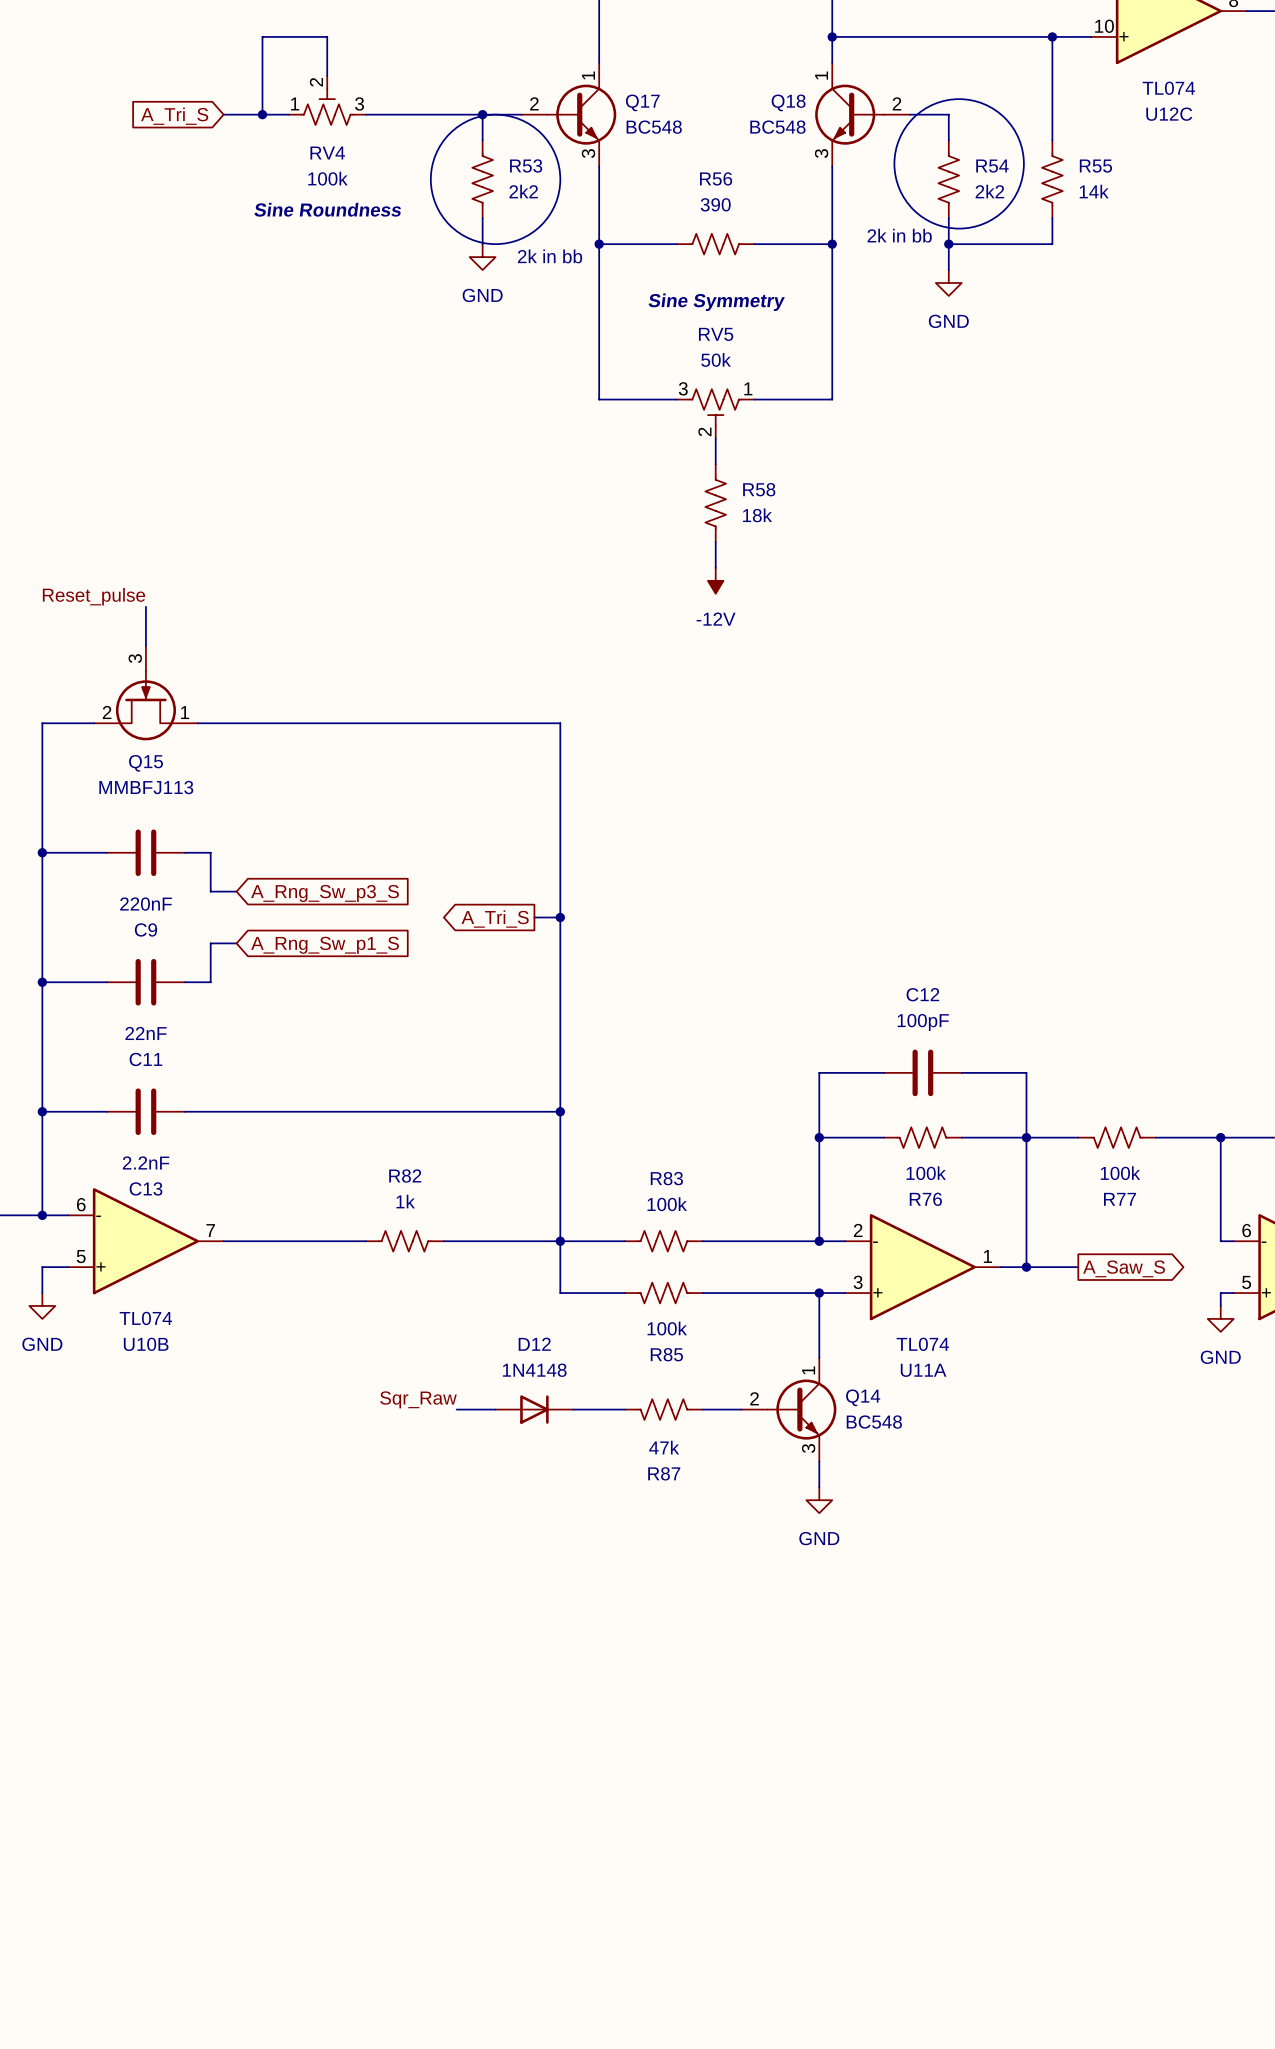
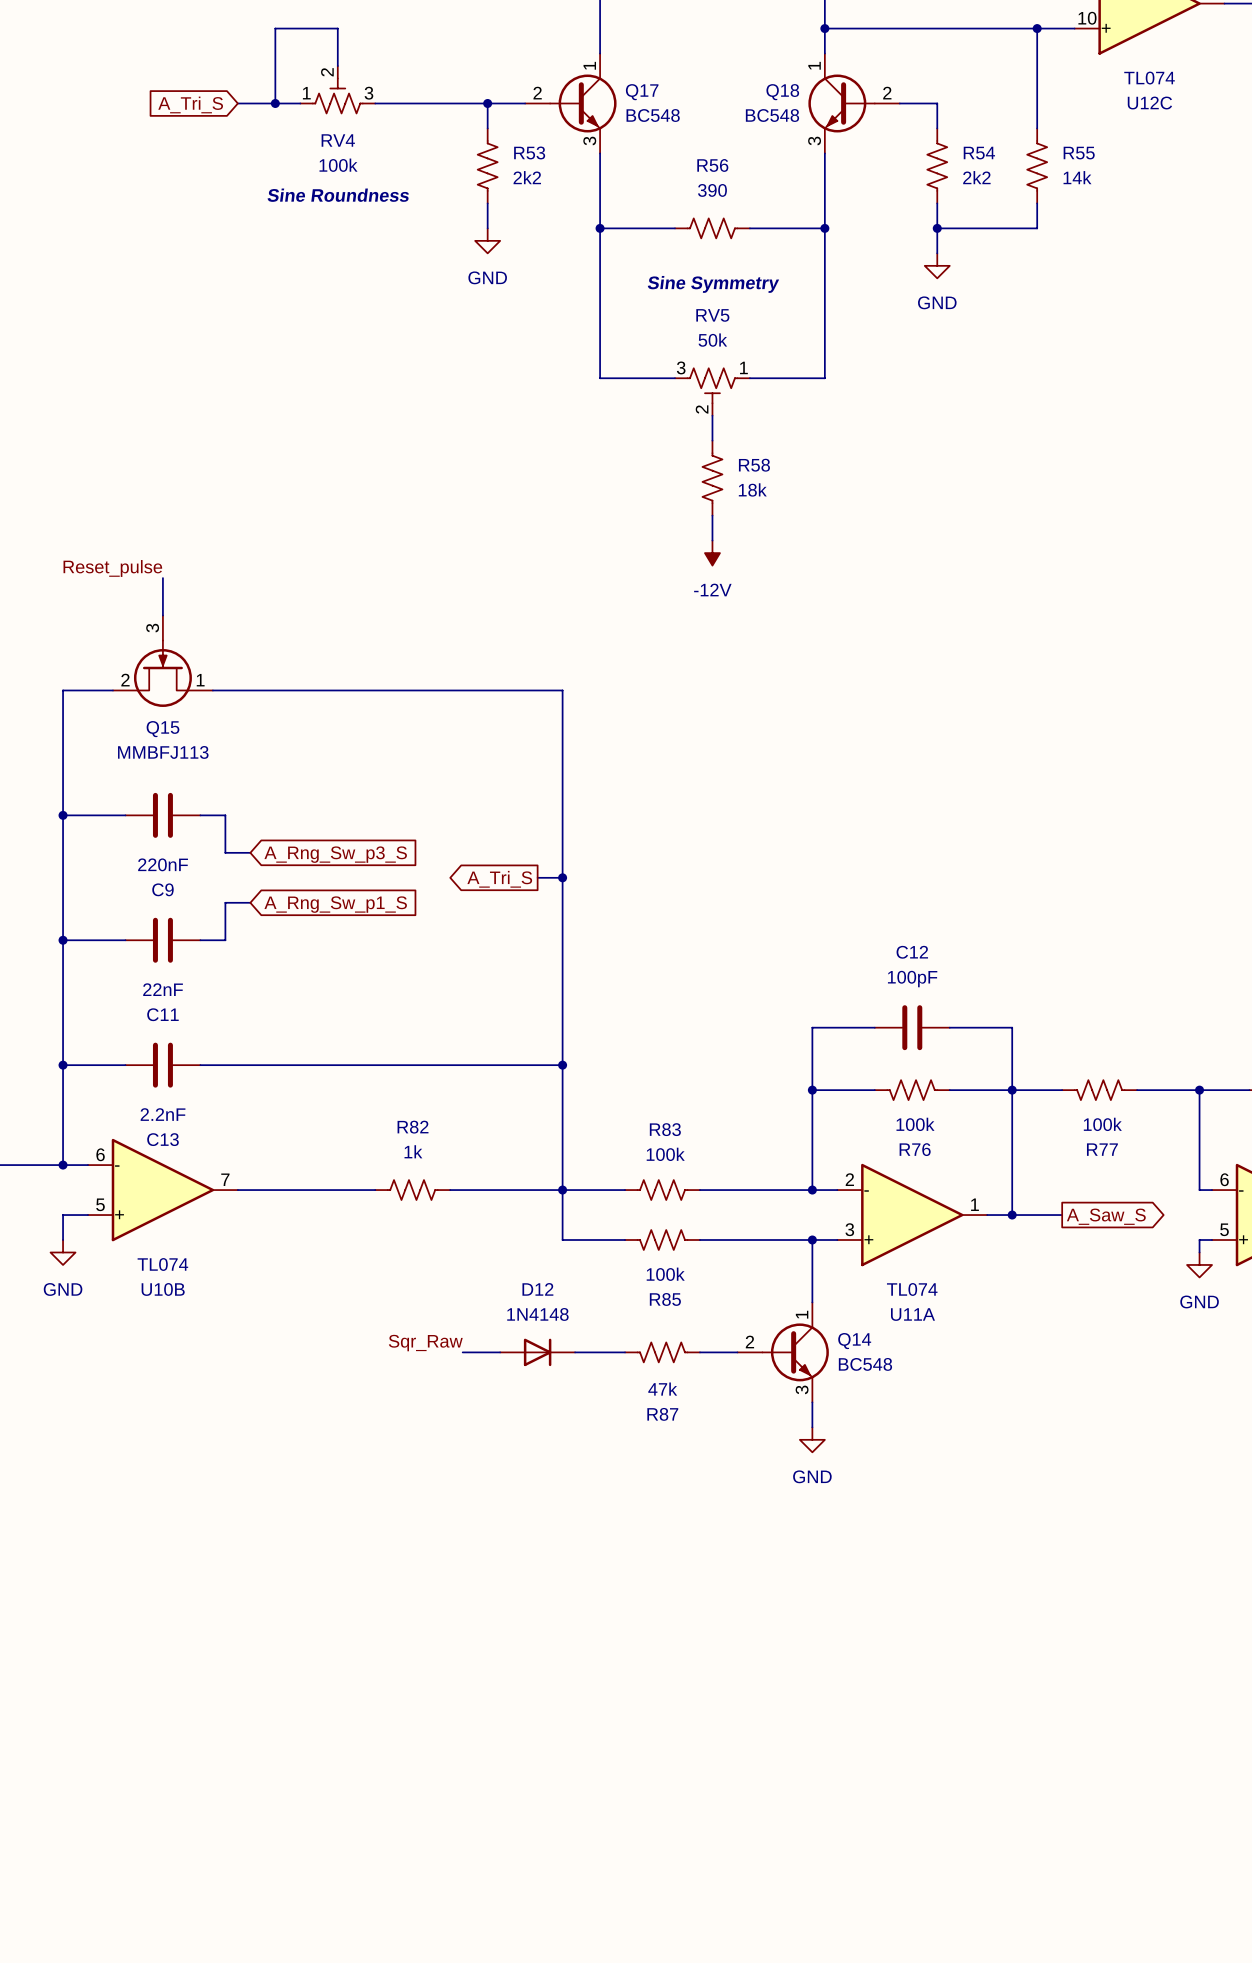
drawing: [894, 99, 1024, 229] -> none
drawing: [430, 114, 561, 245] -> none
text: 2k in bb (899, 235) -> none
text: 2k in bb (550, 256) -> none

